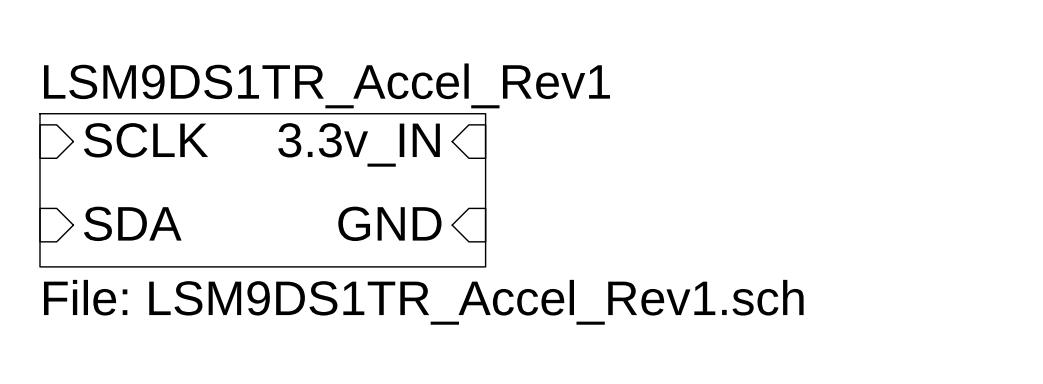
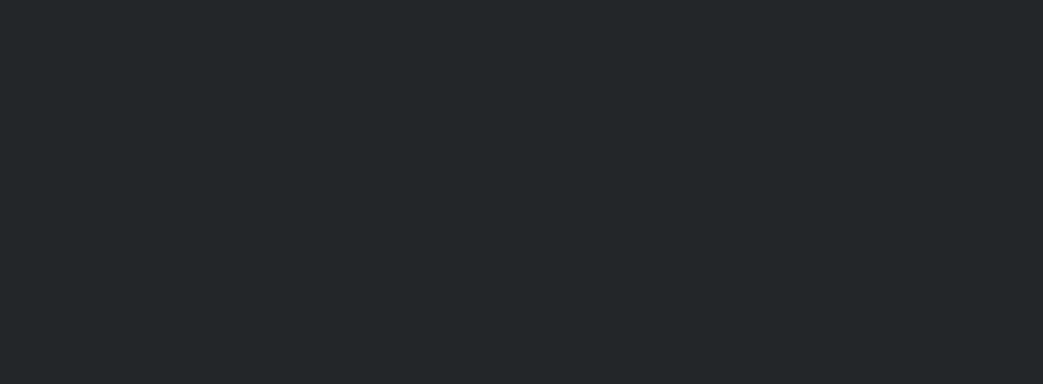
sheet pin: SCLK (146, 140) -> none
sheet pin: 3.3v_IN (359, 144) -> none
sheet LSM9DS1TR_Accel_Rev1: File: LSM9DS1TR_Accel_Rev1.sch (262, 190) -> none
sheet pin: SDA (132, 223) -> none
sheet pin: GND (389, 223) -> none

